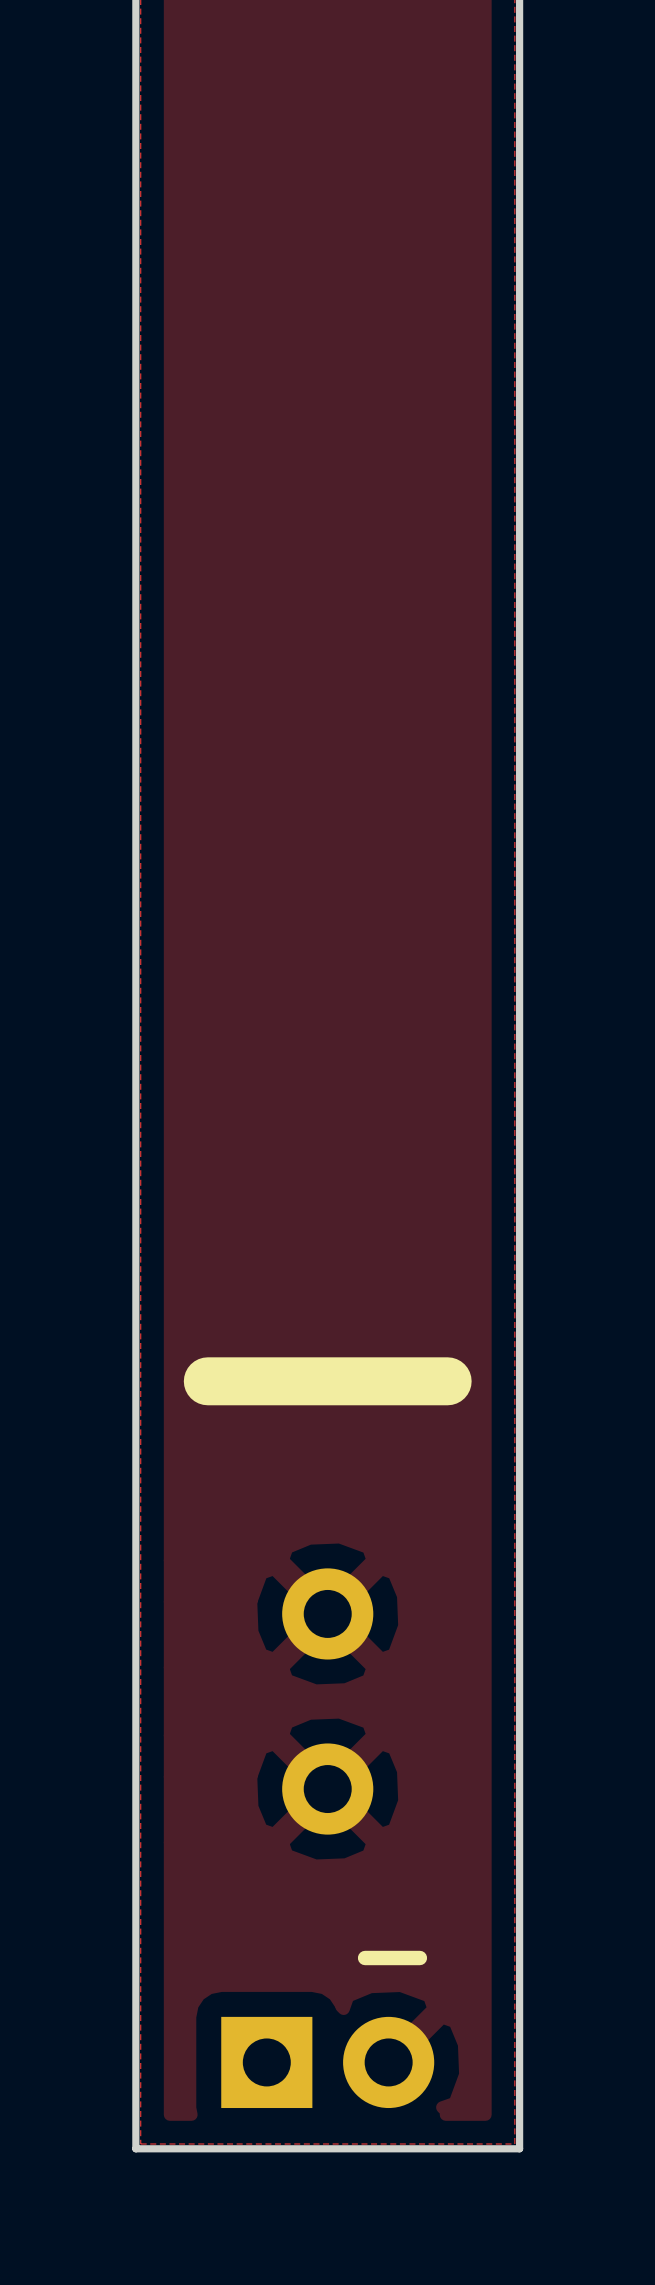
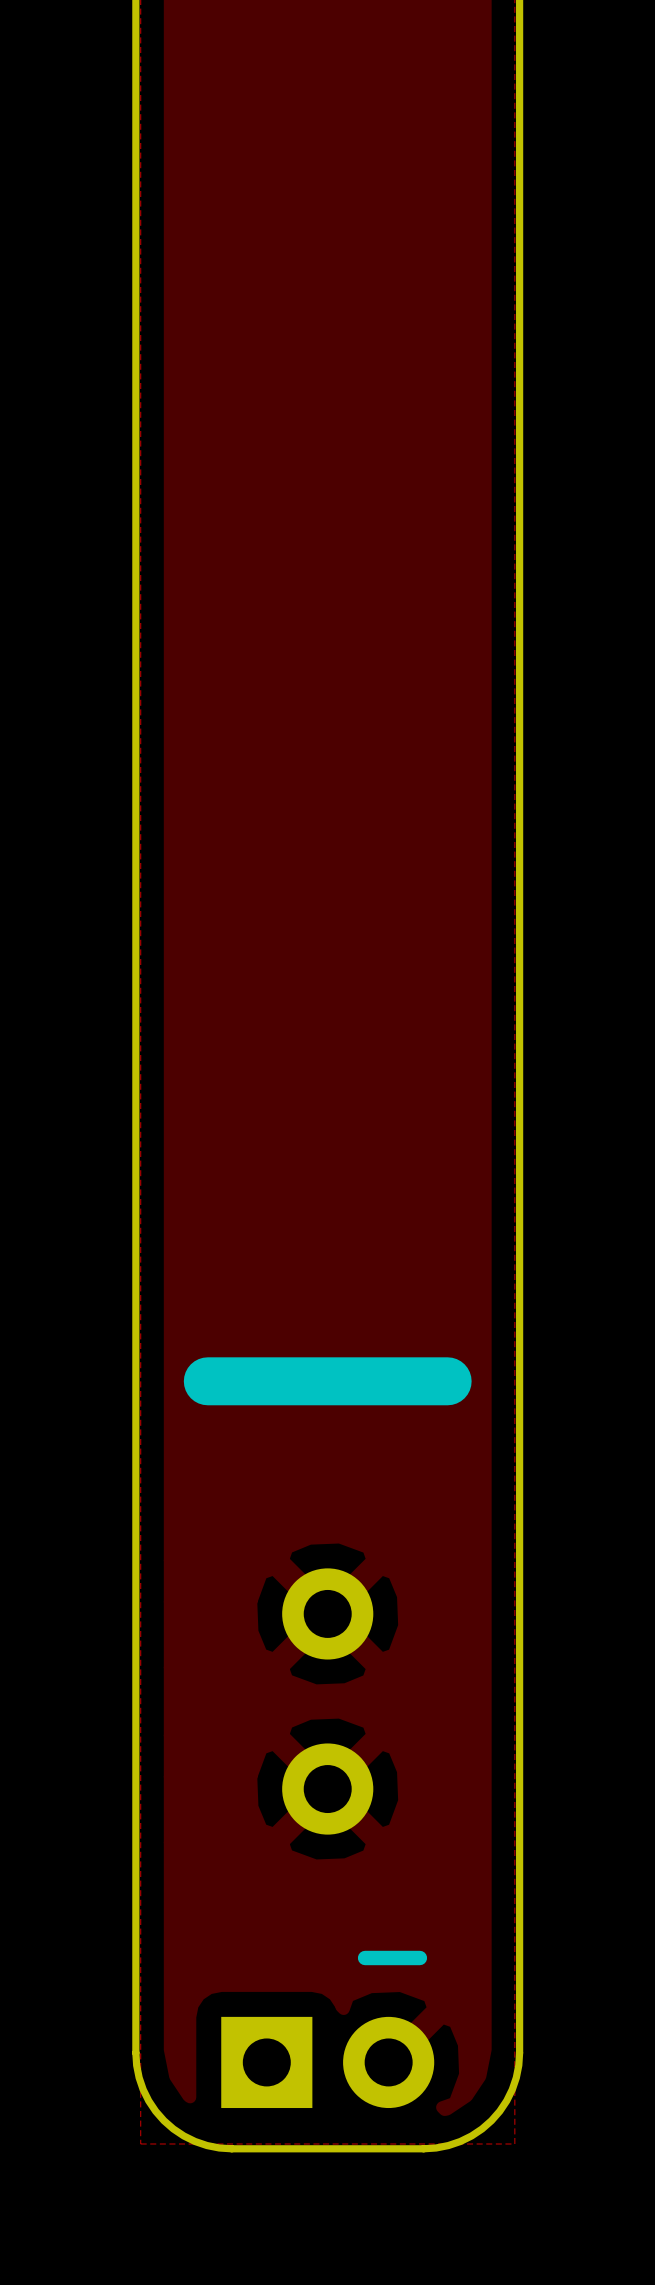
board edge: (135, 2052) (135, 2148) (231, 2148) -> (135, 2052) (136, 2065) (143, 2089) (155, 2111) (163, 2120) (183, 2135) (195, 2141) (206, 2145) (231, 2148)
board edge: (519, 2052) (519, 2148) (423, 2148) -> (519, 2052) (518, 2065) (512, 2089) (499, 2111) (491, 2120) (471, 2135) (460, 2141) (448, 2145) (423, 2148)

